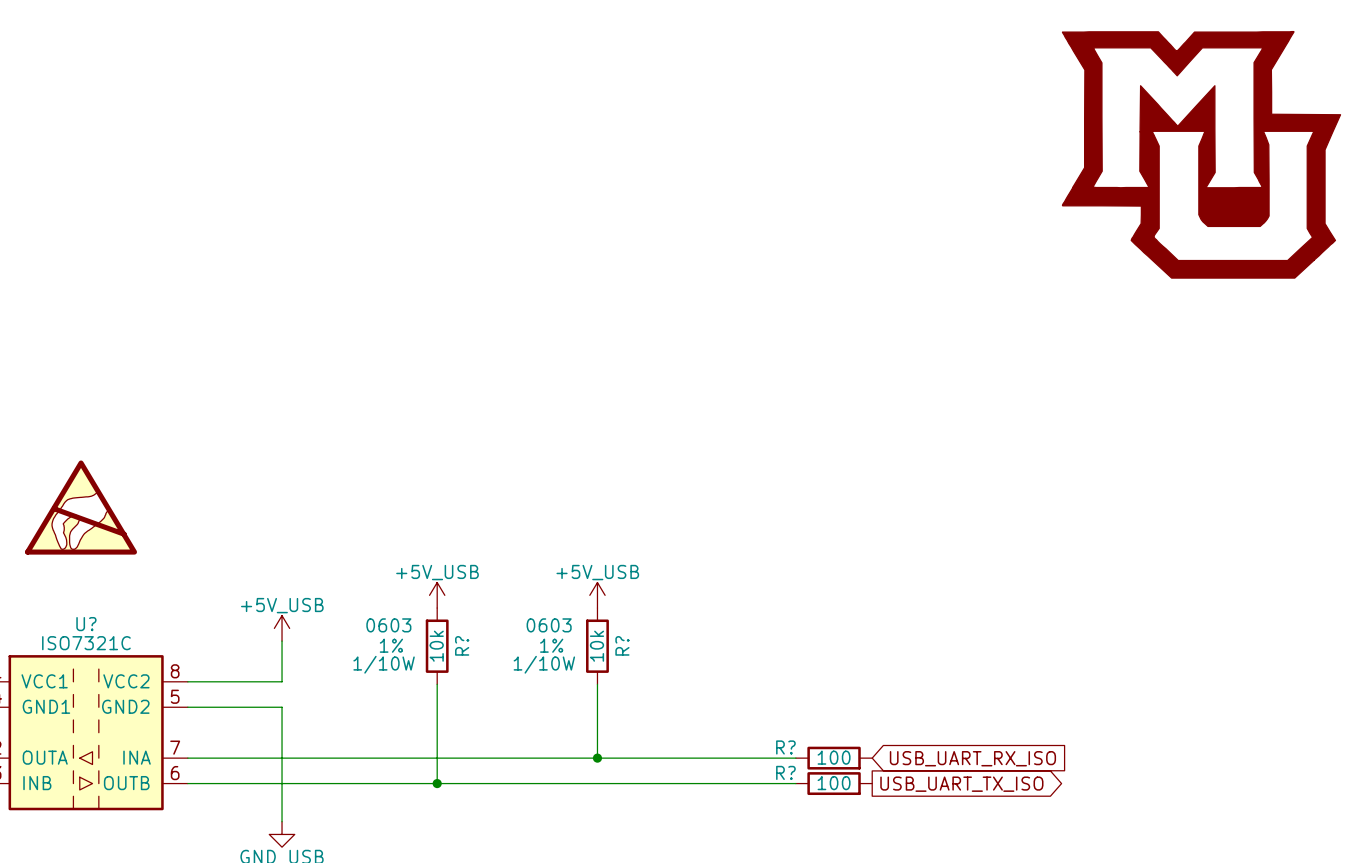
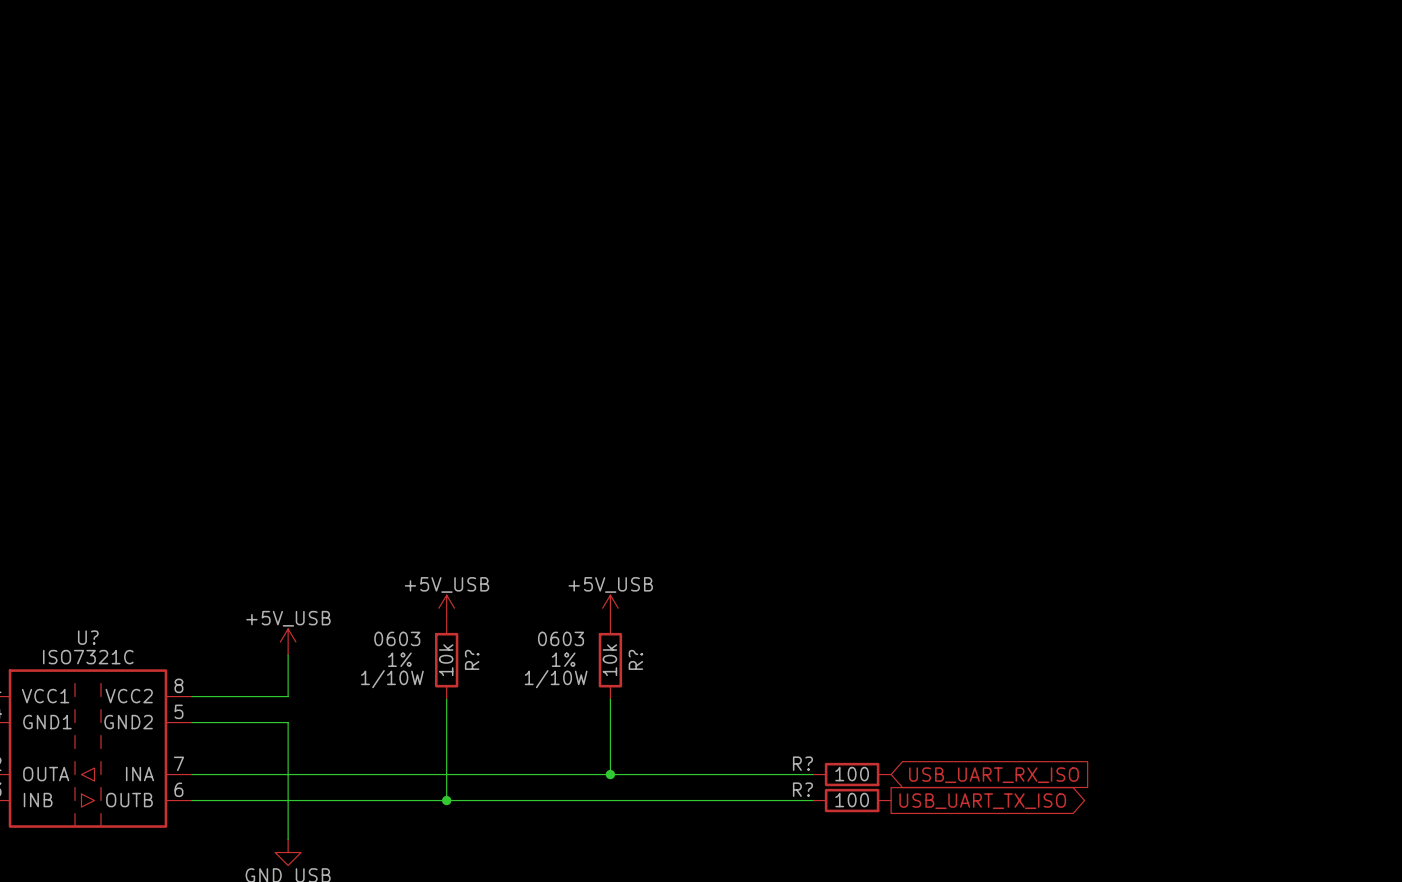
power symbol: (1201, 154) -> none
power symbol: (81, 507) -> none

